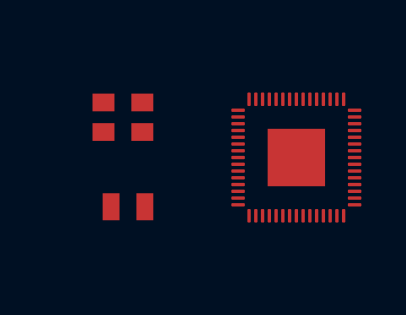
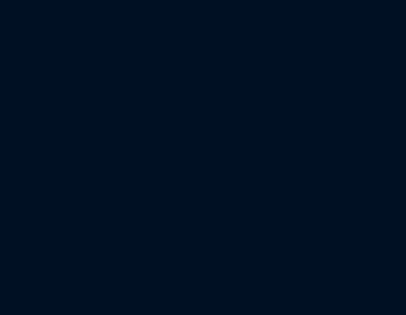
part: (122, 117) -> none
part: (296, 157) -> none
part: (127, 206) -> none

